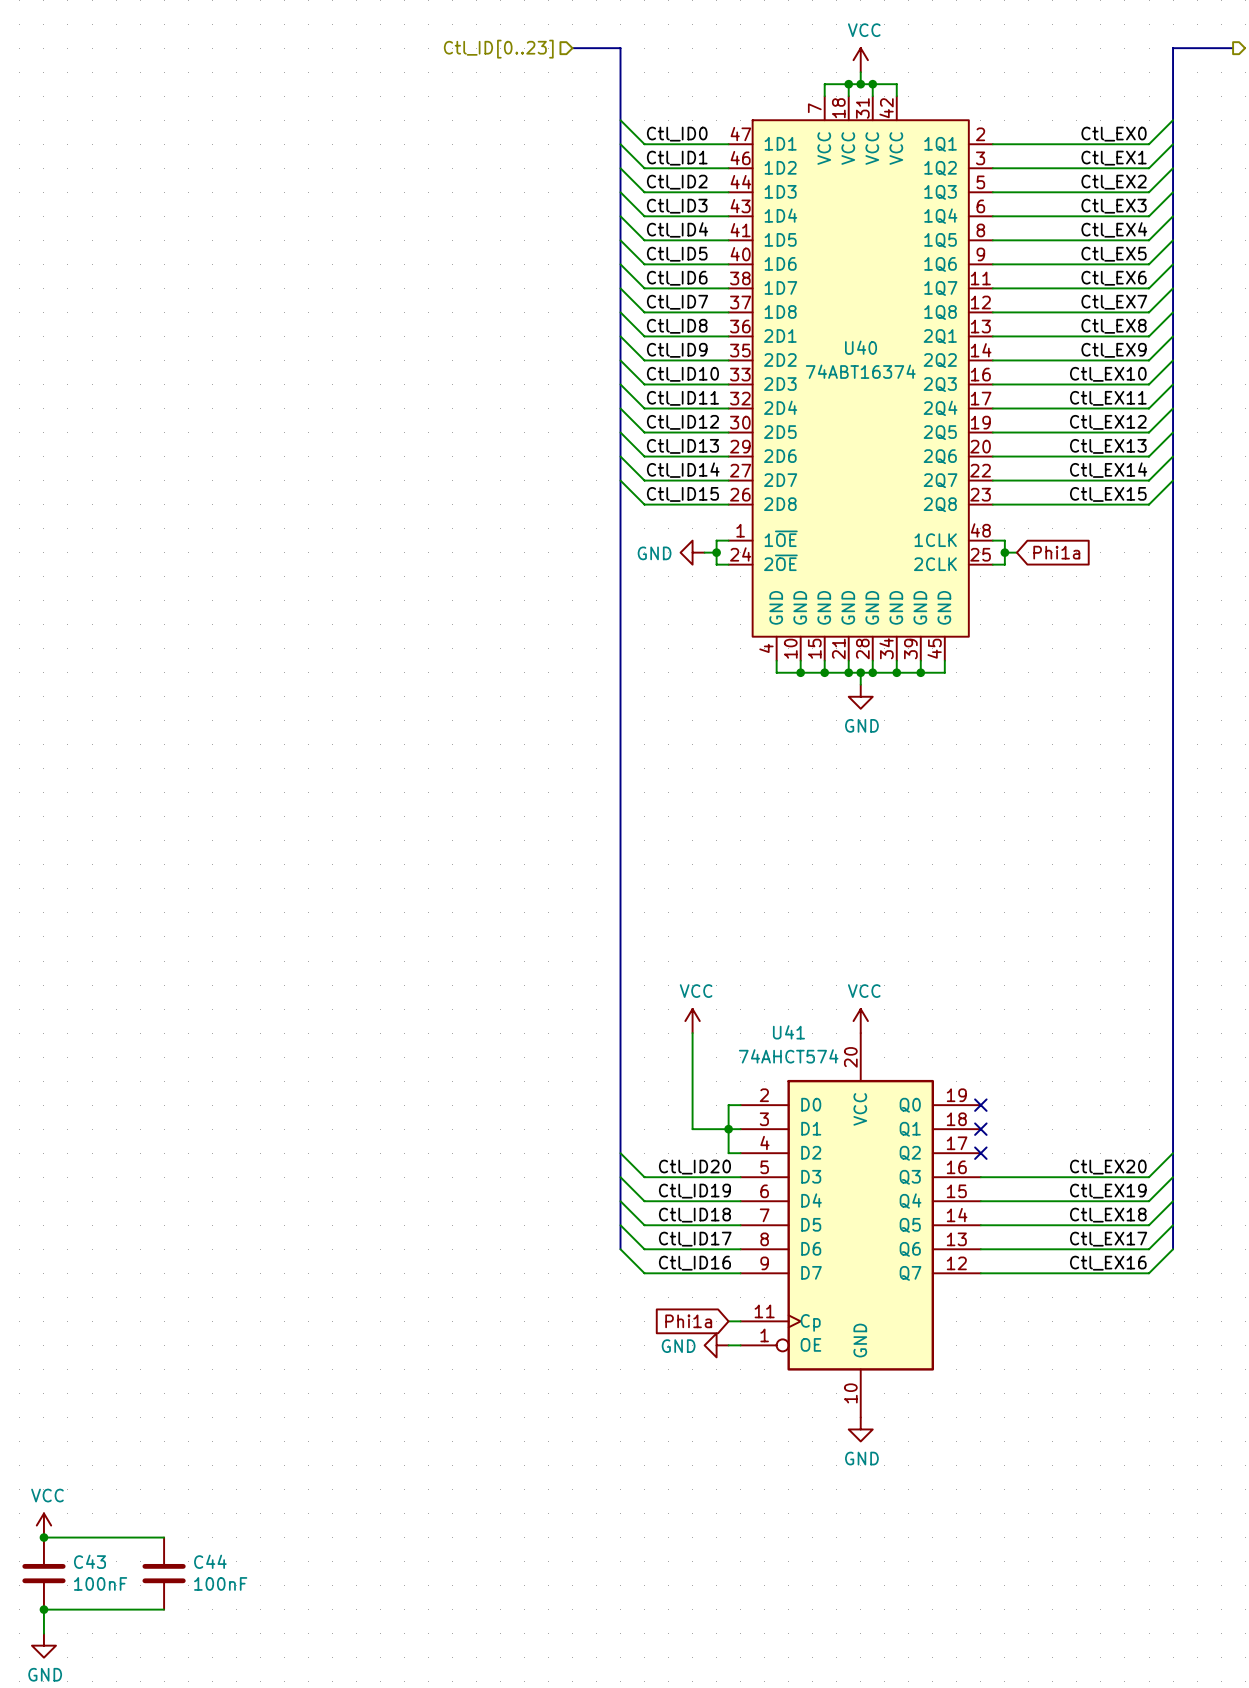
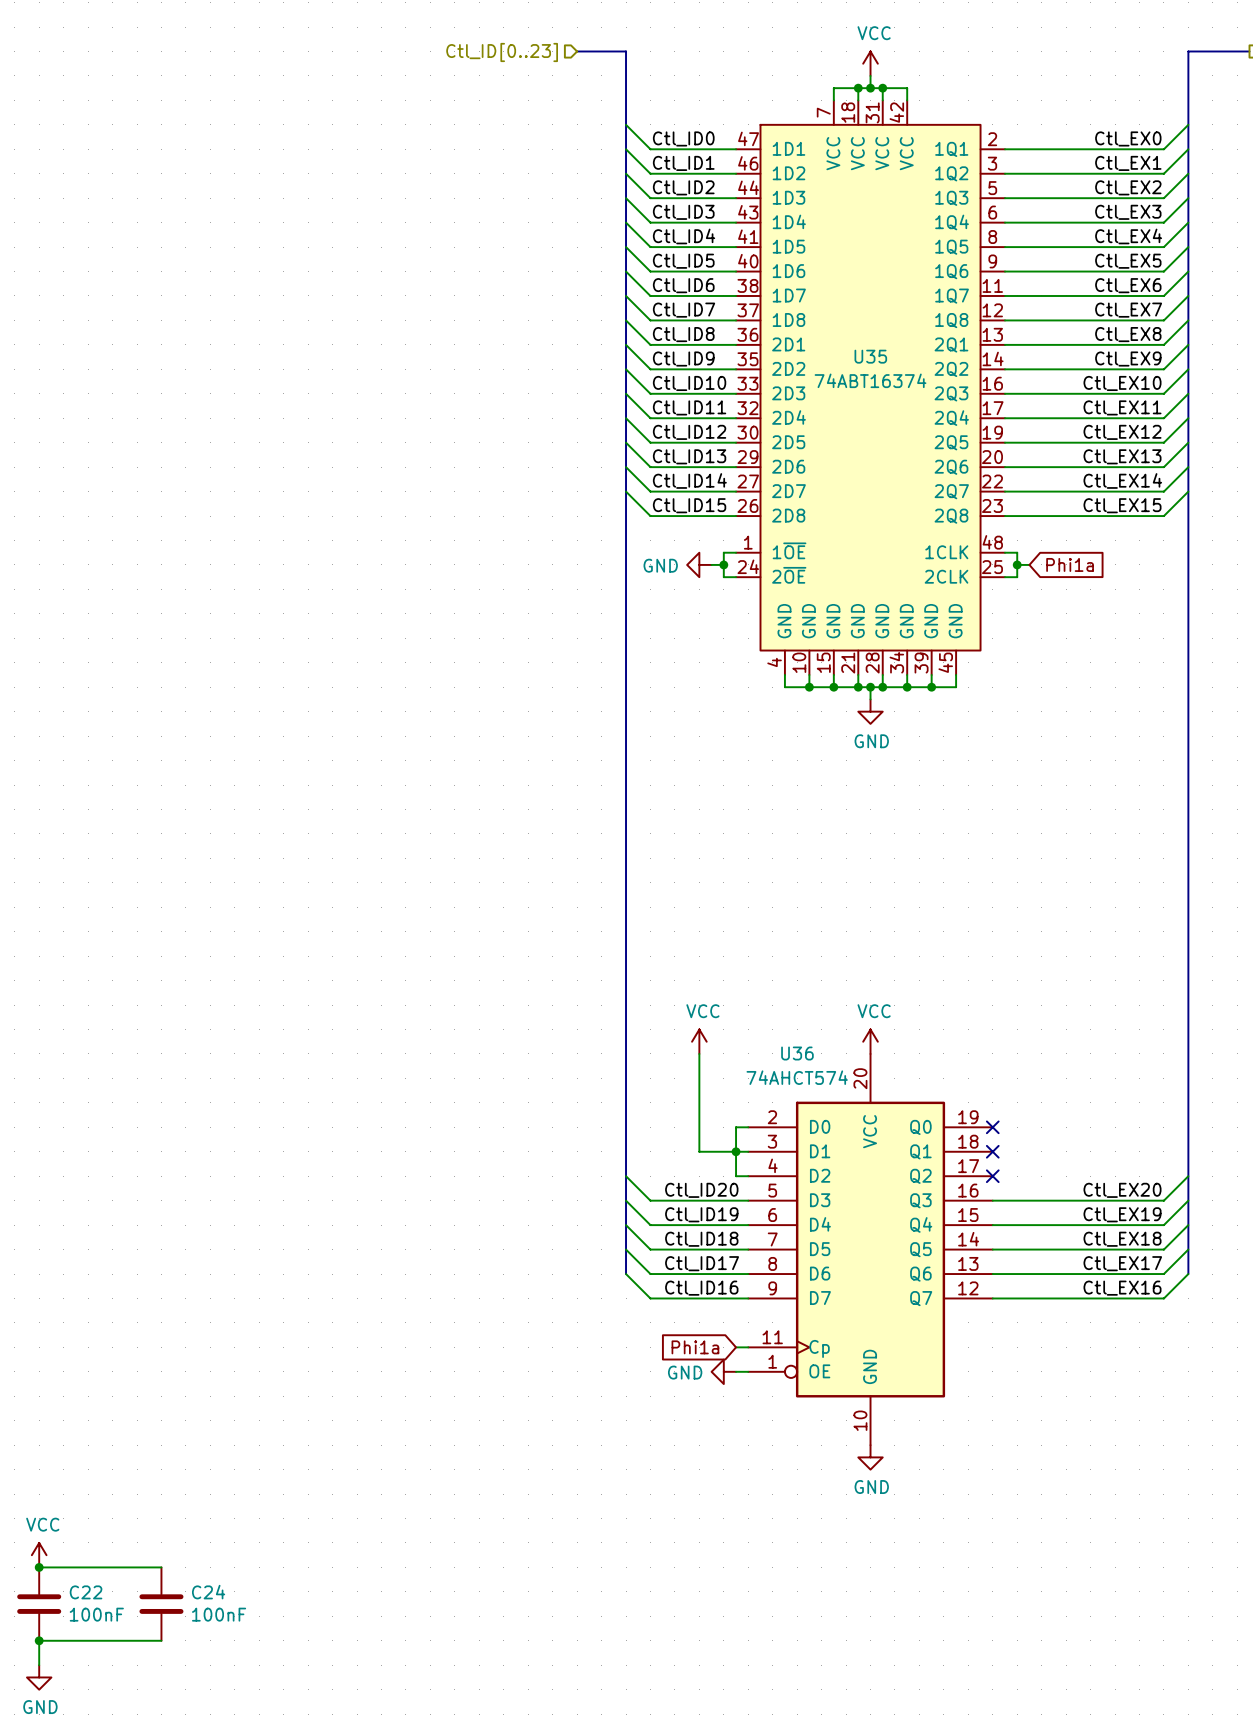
U40 name: U40 (861, 347) -> U35 (870, 356)
U41 name: U41 (788, 1032) -> U36 (797, 1053)
C43 name: C43 (89, 1561) -> C22 (86, 1592)
C44 name: C44 (210, 1561) -> C24 (208, 1592)

